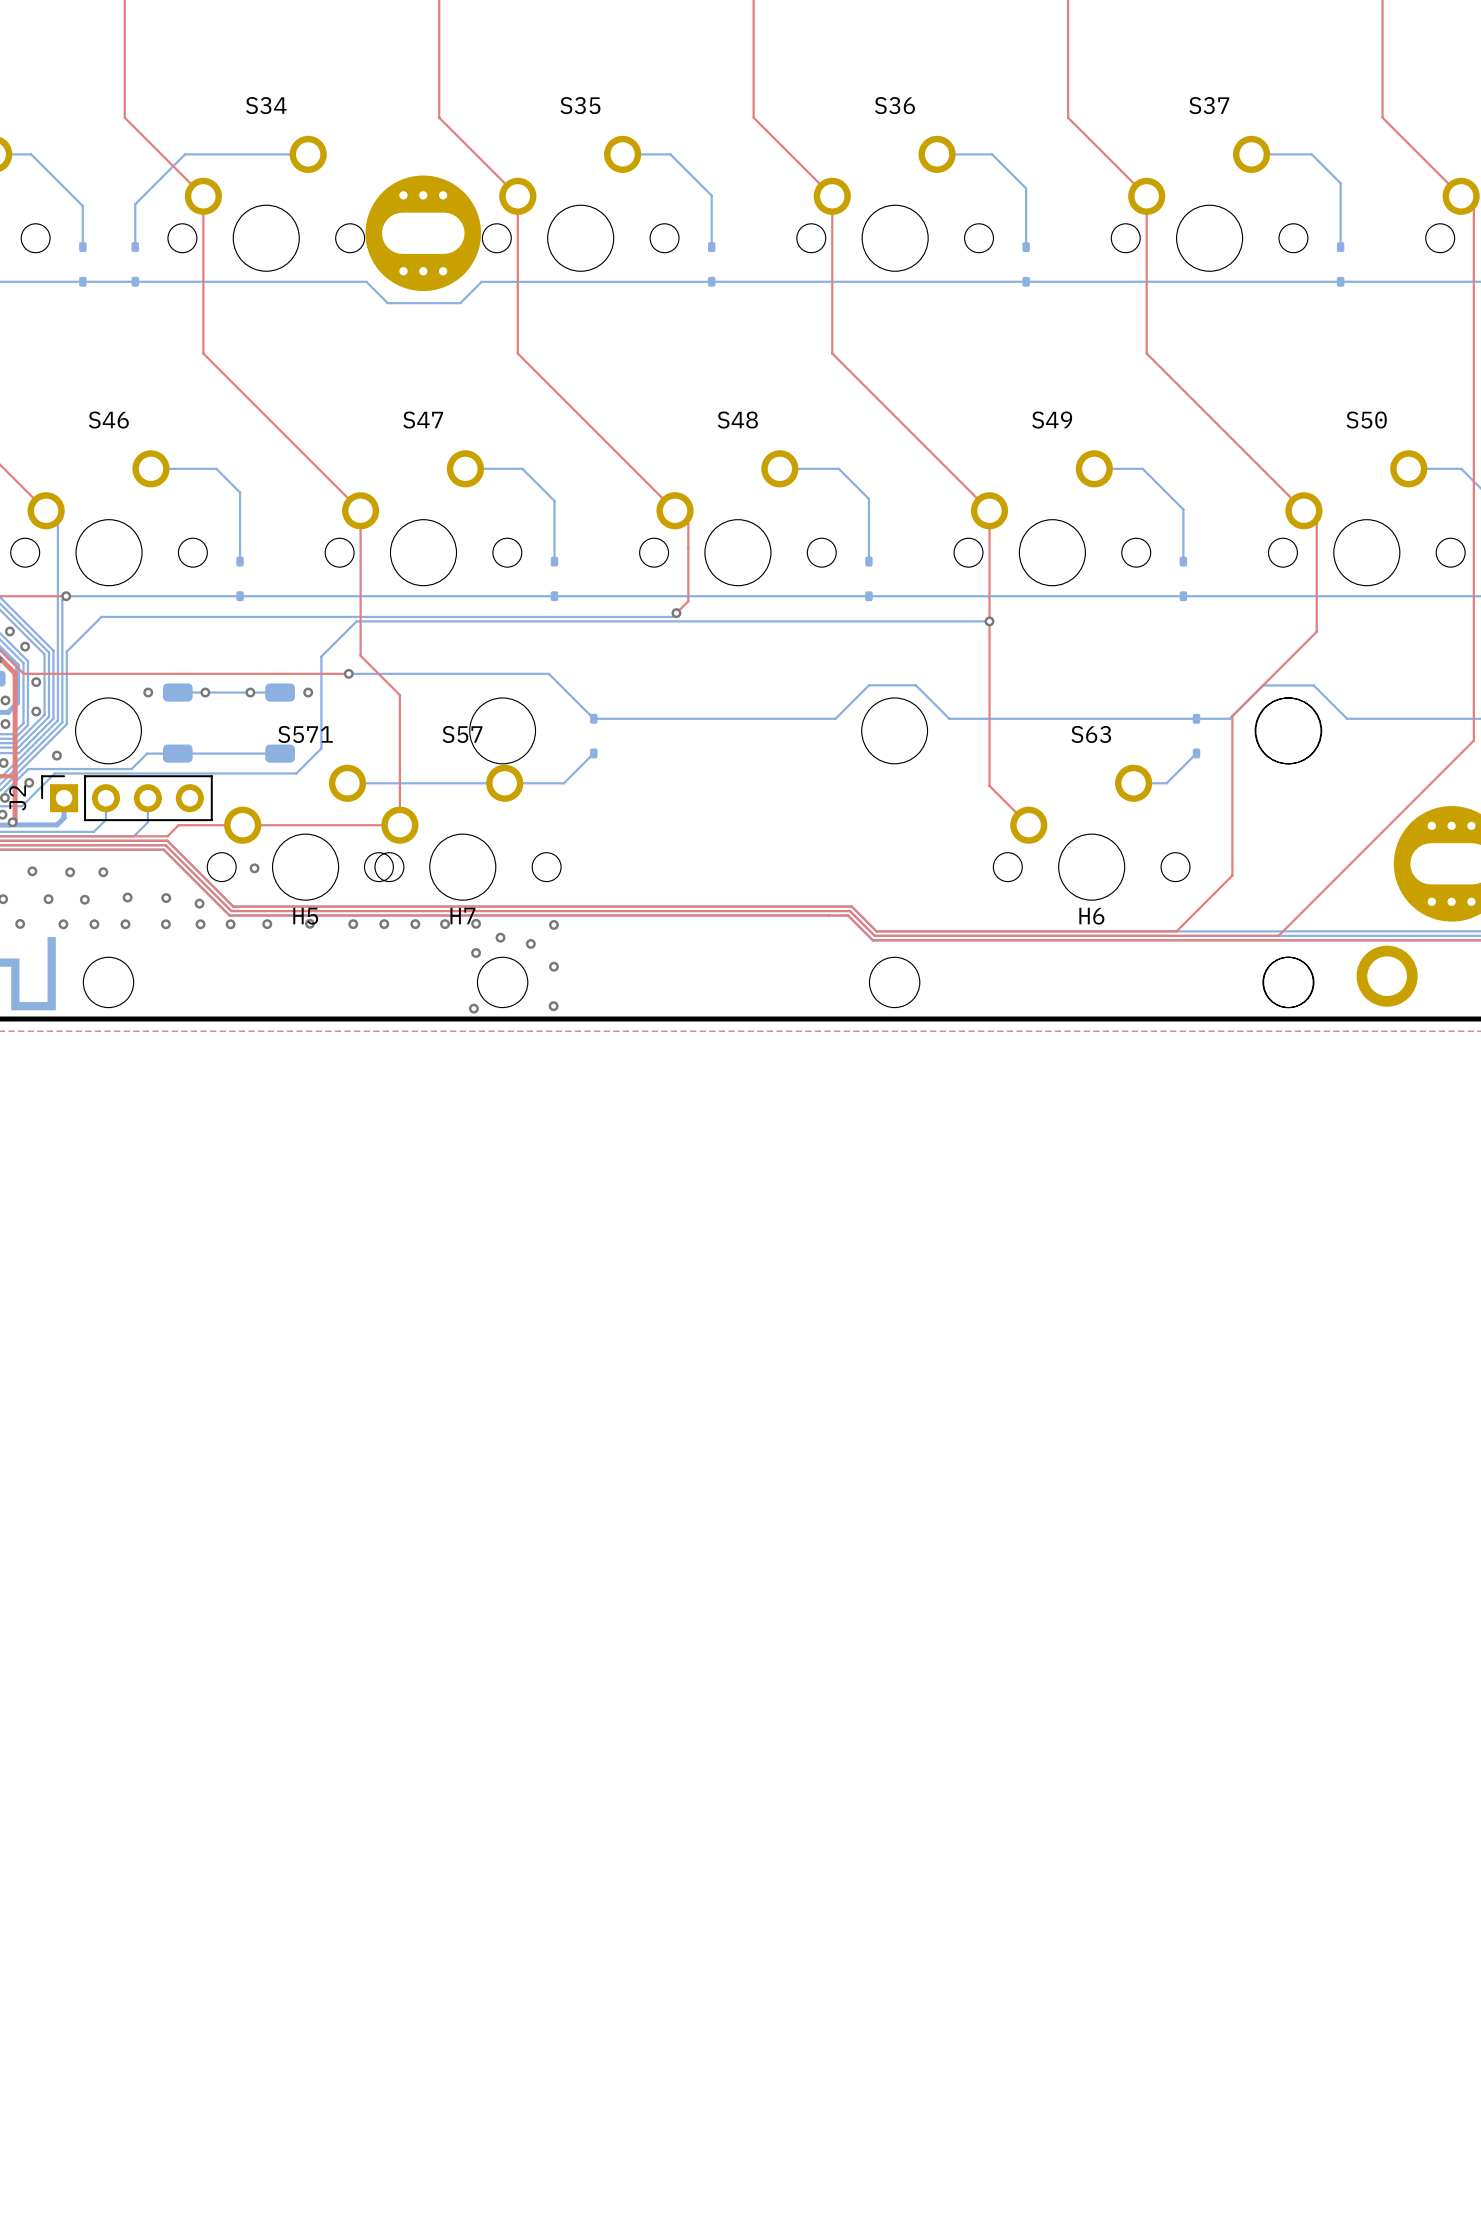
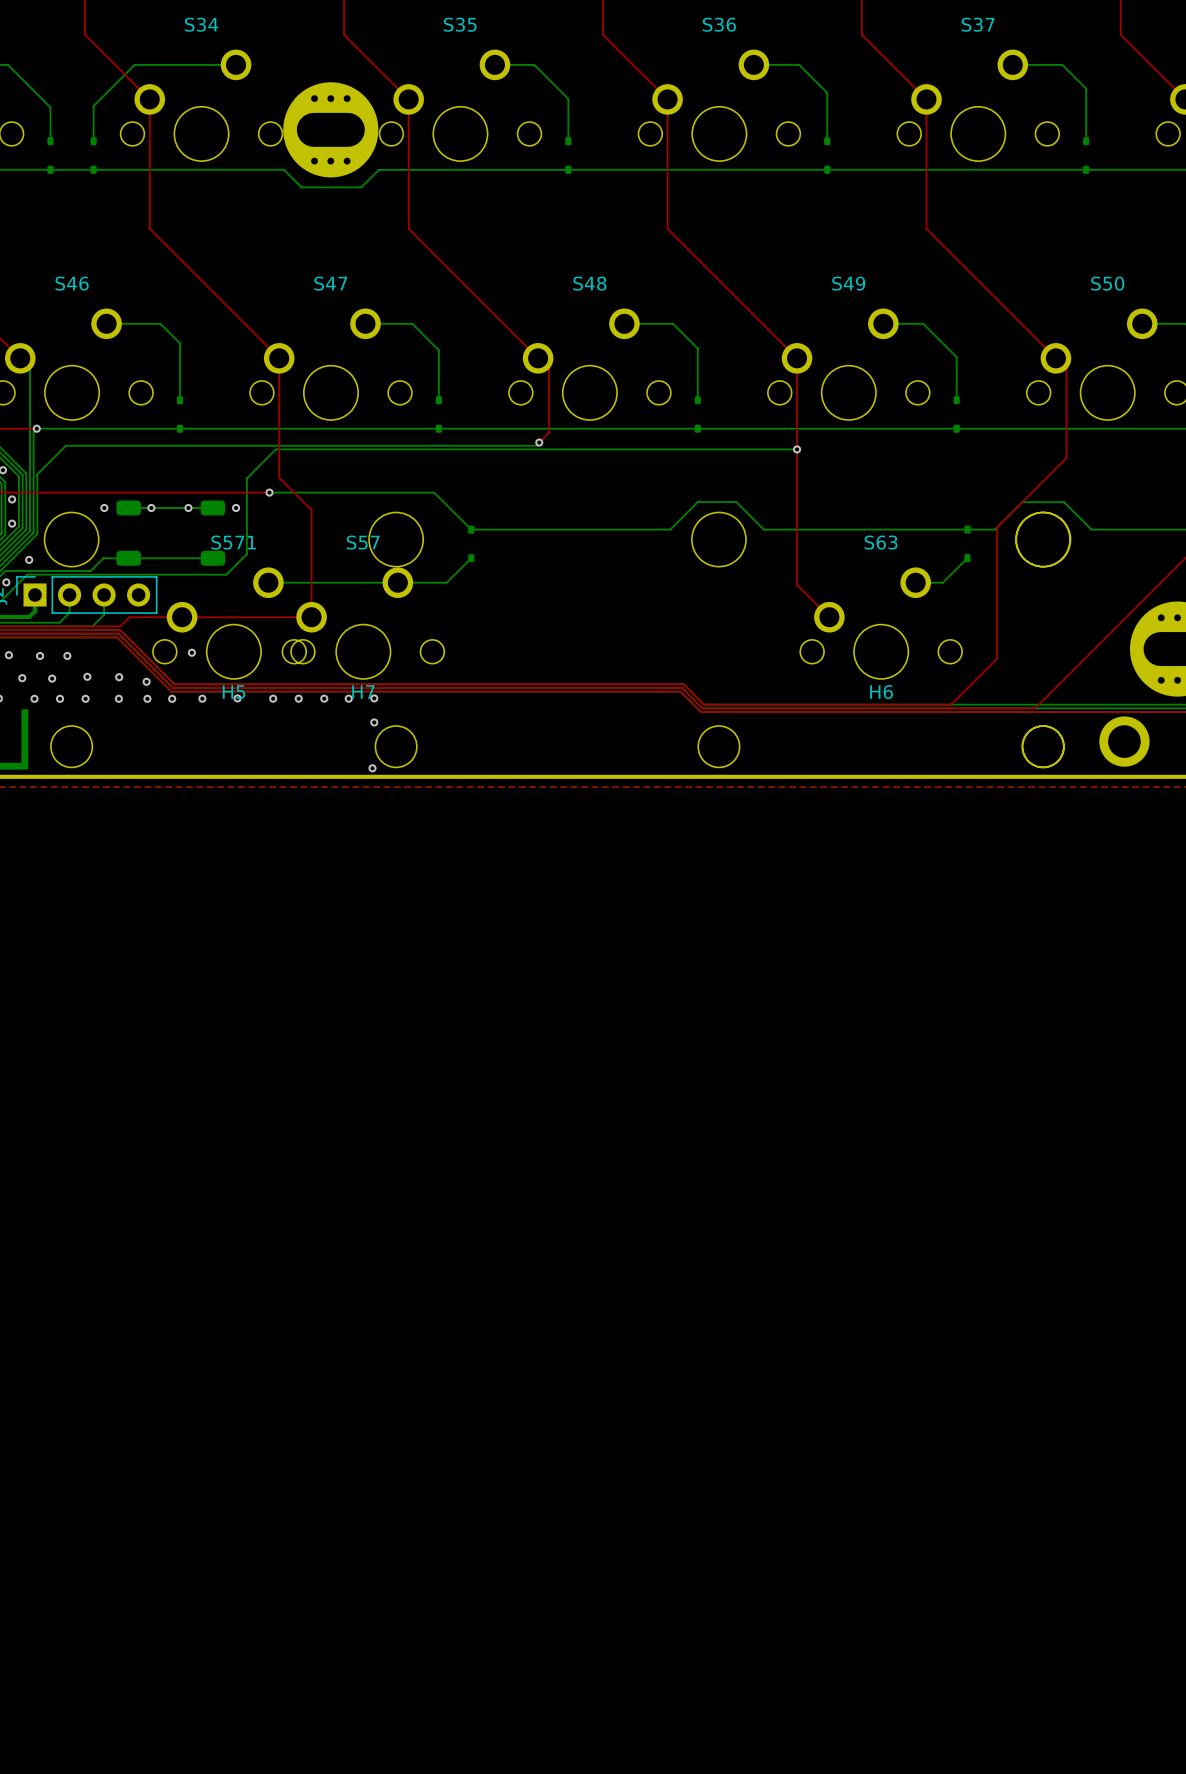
via: (553, 924) -> none
via: (500, 937) -> none
via: (530, 943) -> none
via: (553, 966) -> none
via: (553, 1006) -> none

